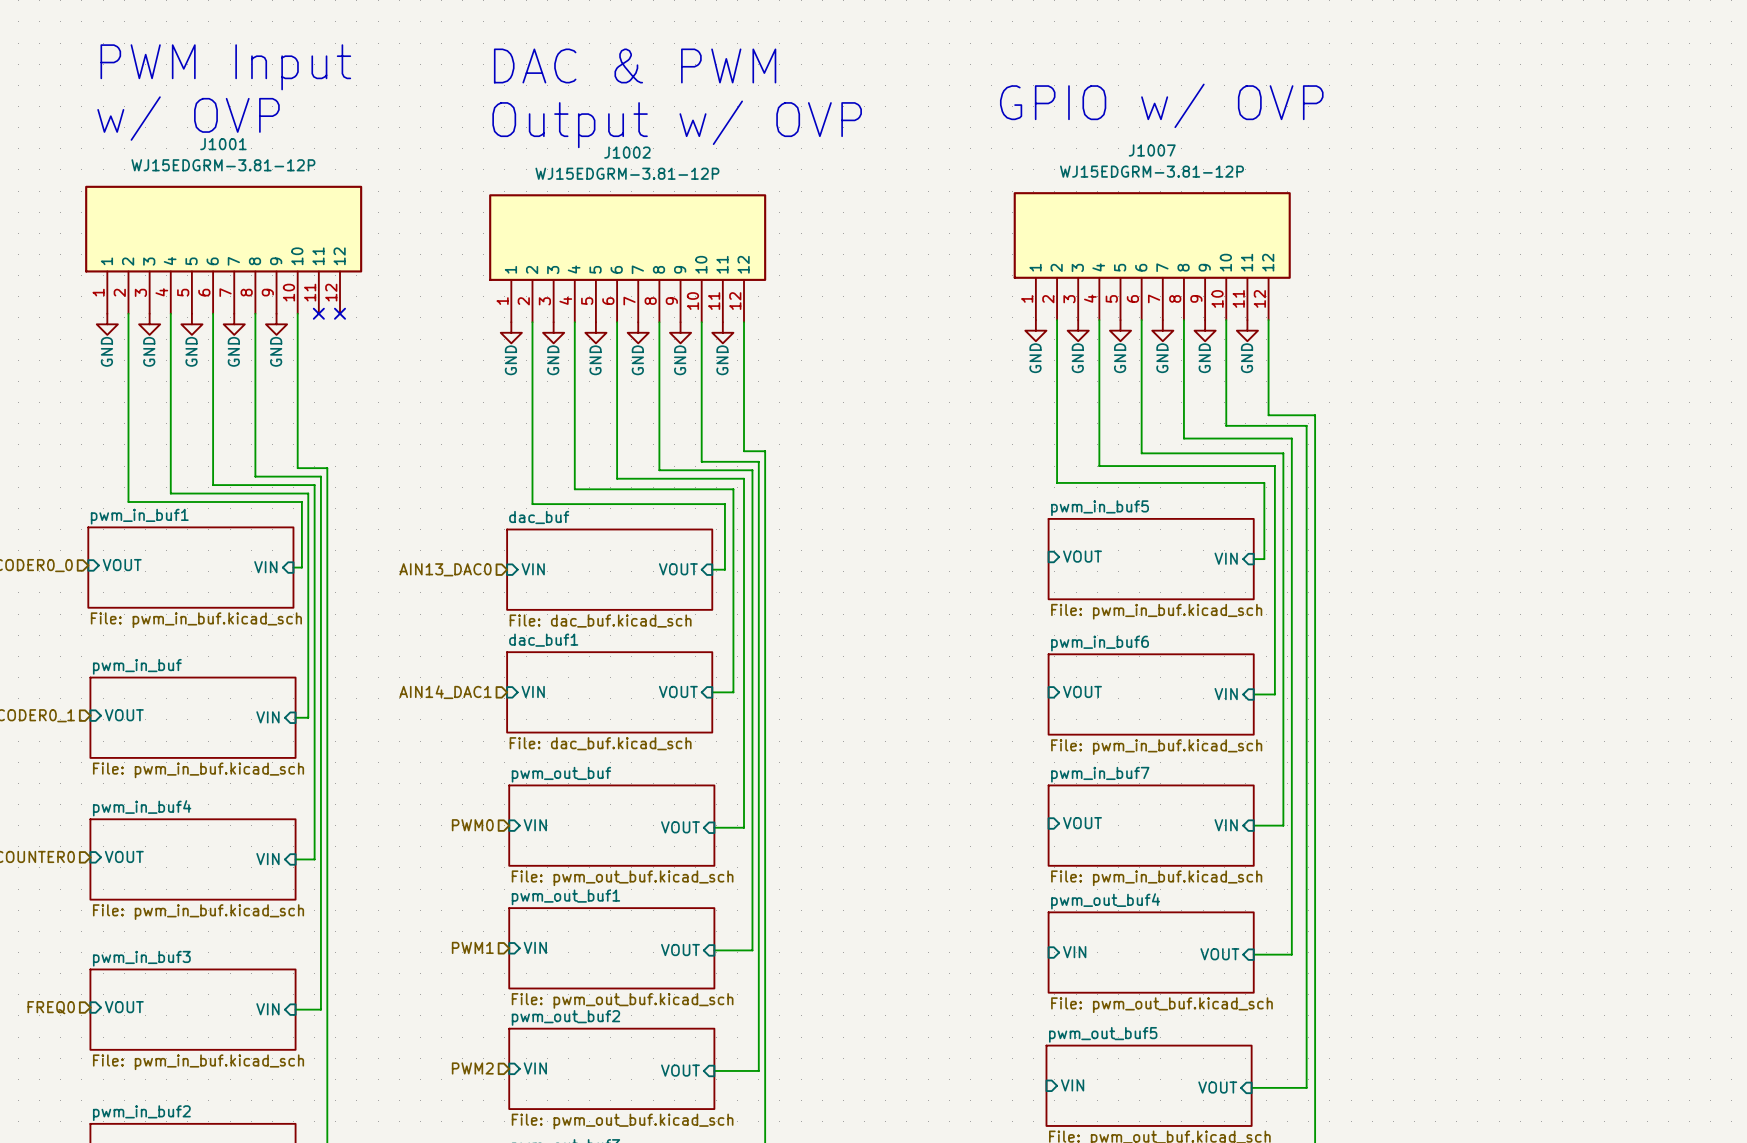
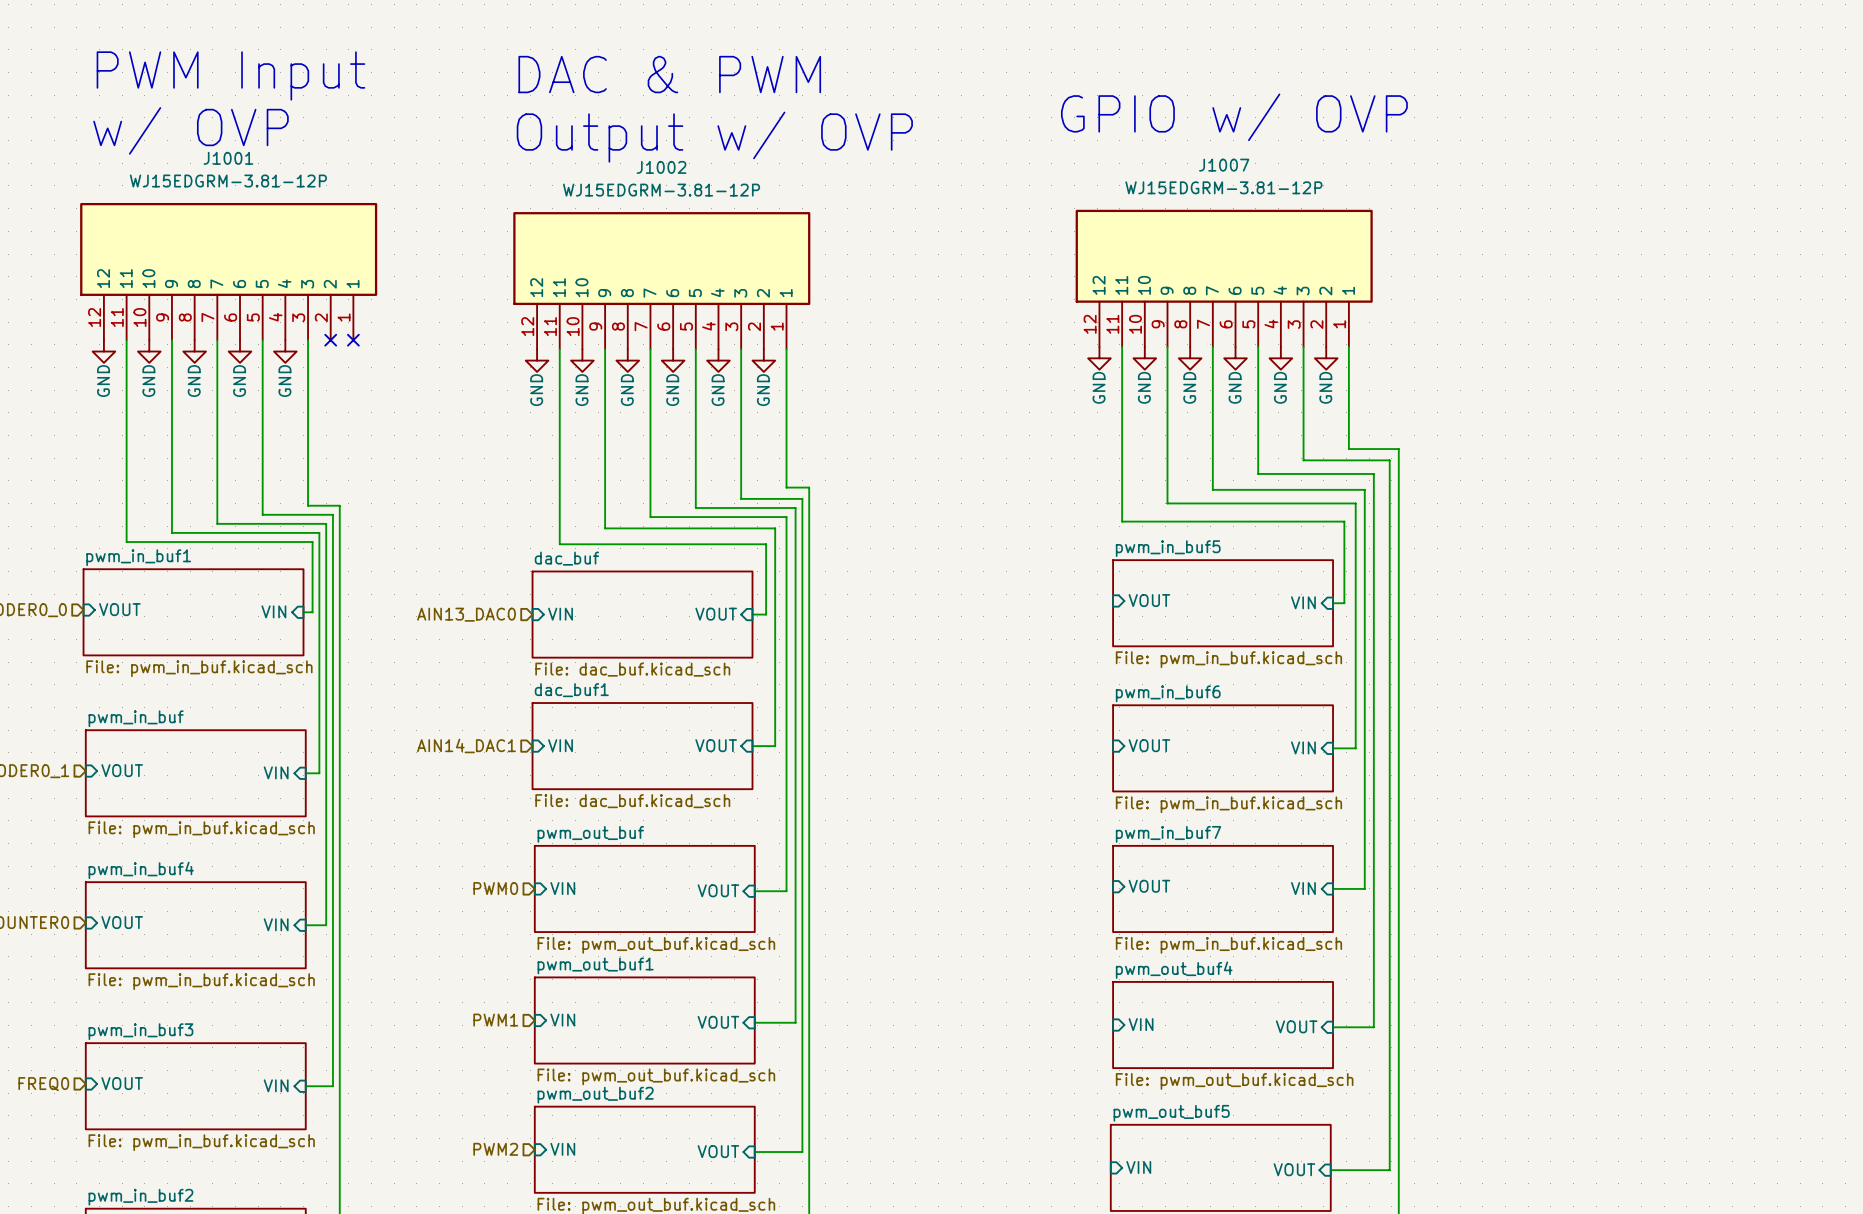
J1001 flip: as is (223, 229) -> left-right (228, 249)
J1007 flip: as is (1152, 235) -> left-right (1224, 256)
J1002 flip: as is (627, 237) -> left-right (661, 258)

